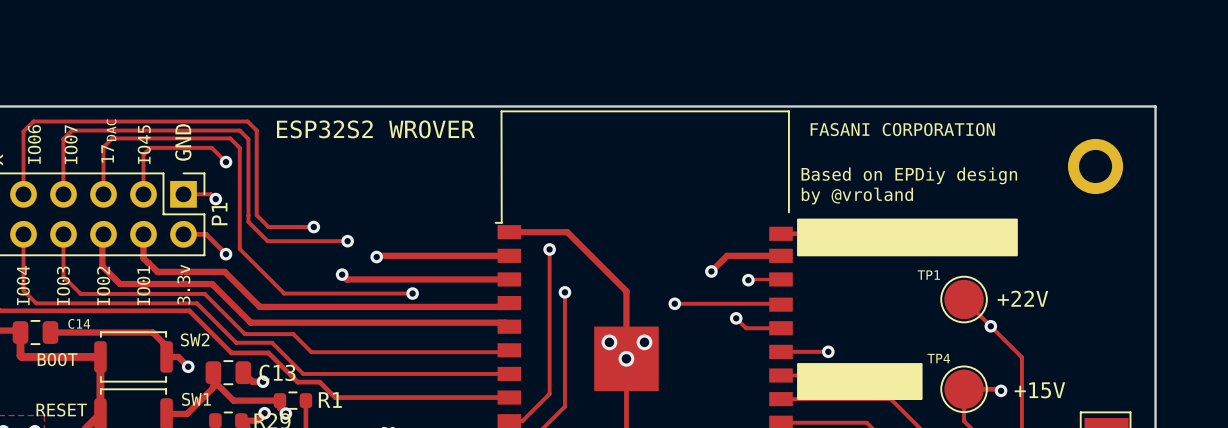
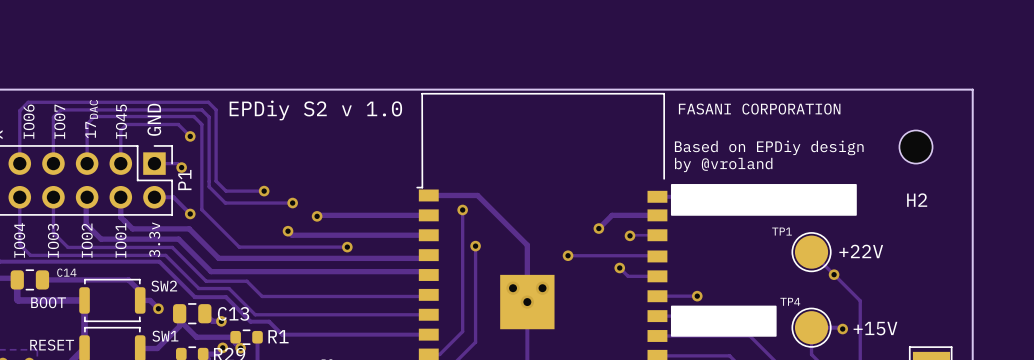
text: ESP32S2 WROVER (375, 129) -> EPDiy S2 v 1.0 (315, 110)
part: (1095, 166) -> none
H2: none -> (915, 147)

